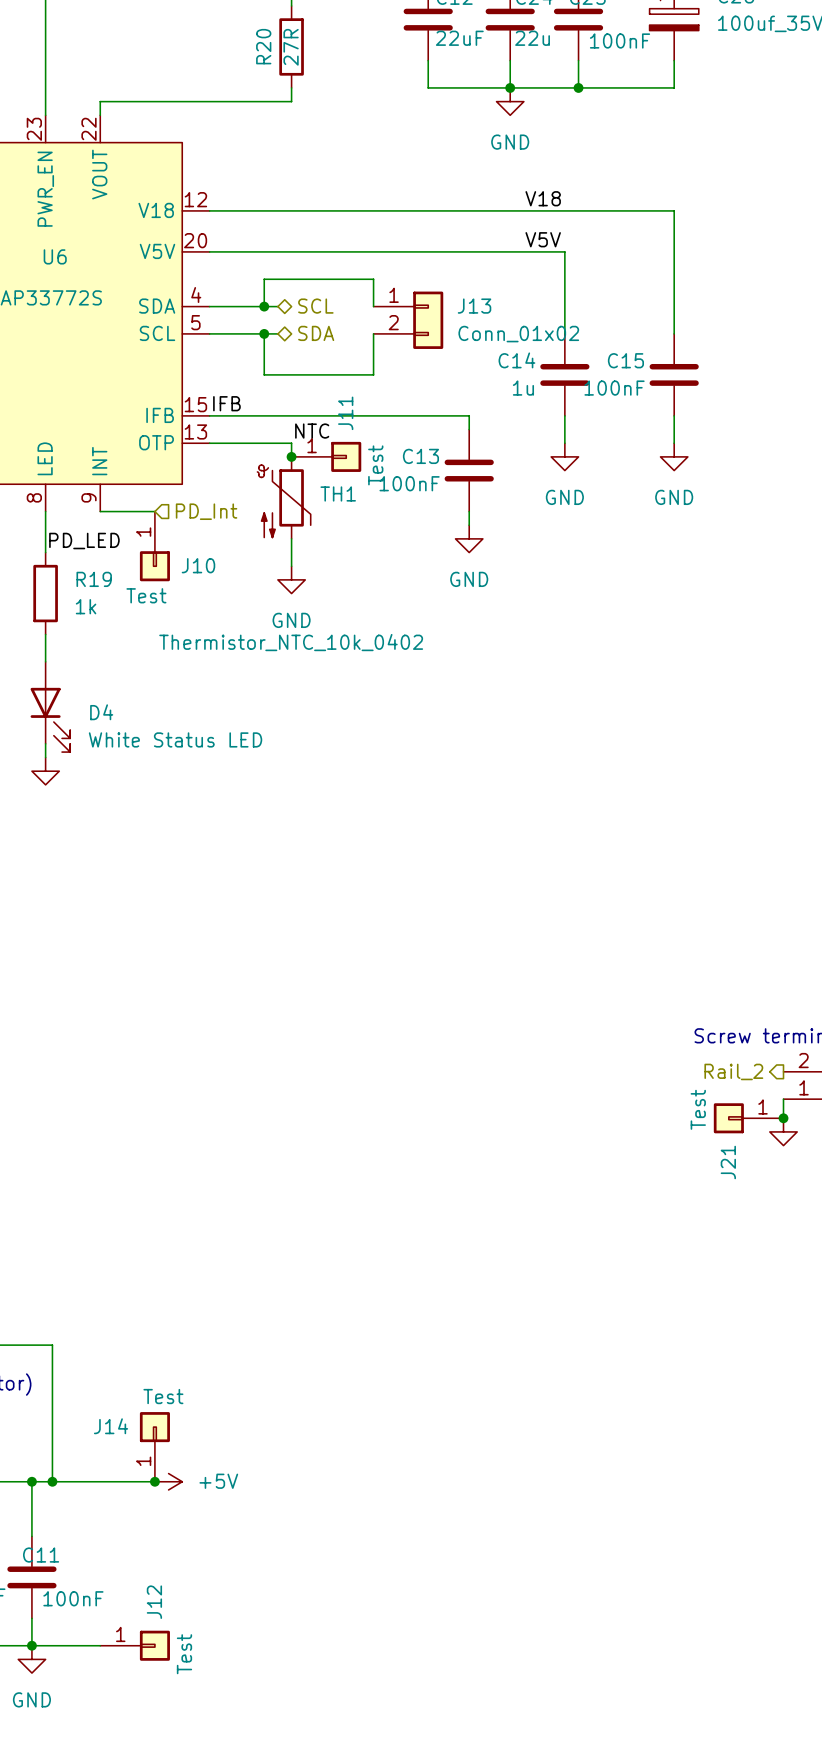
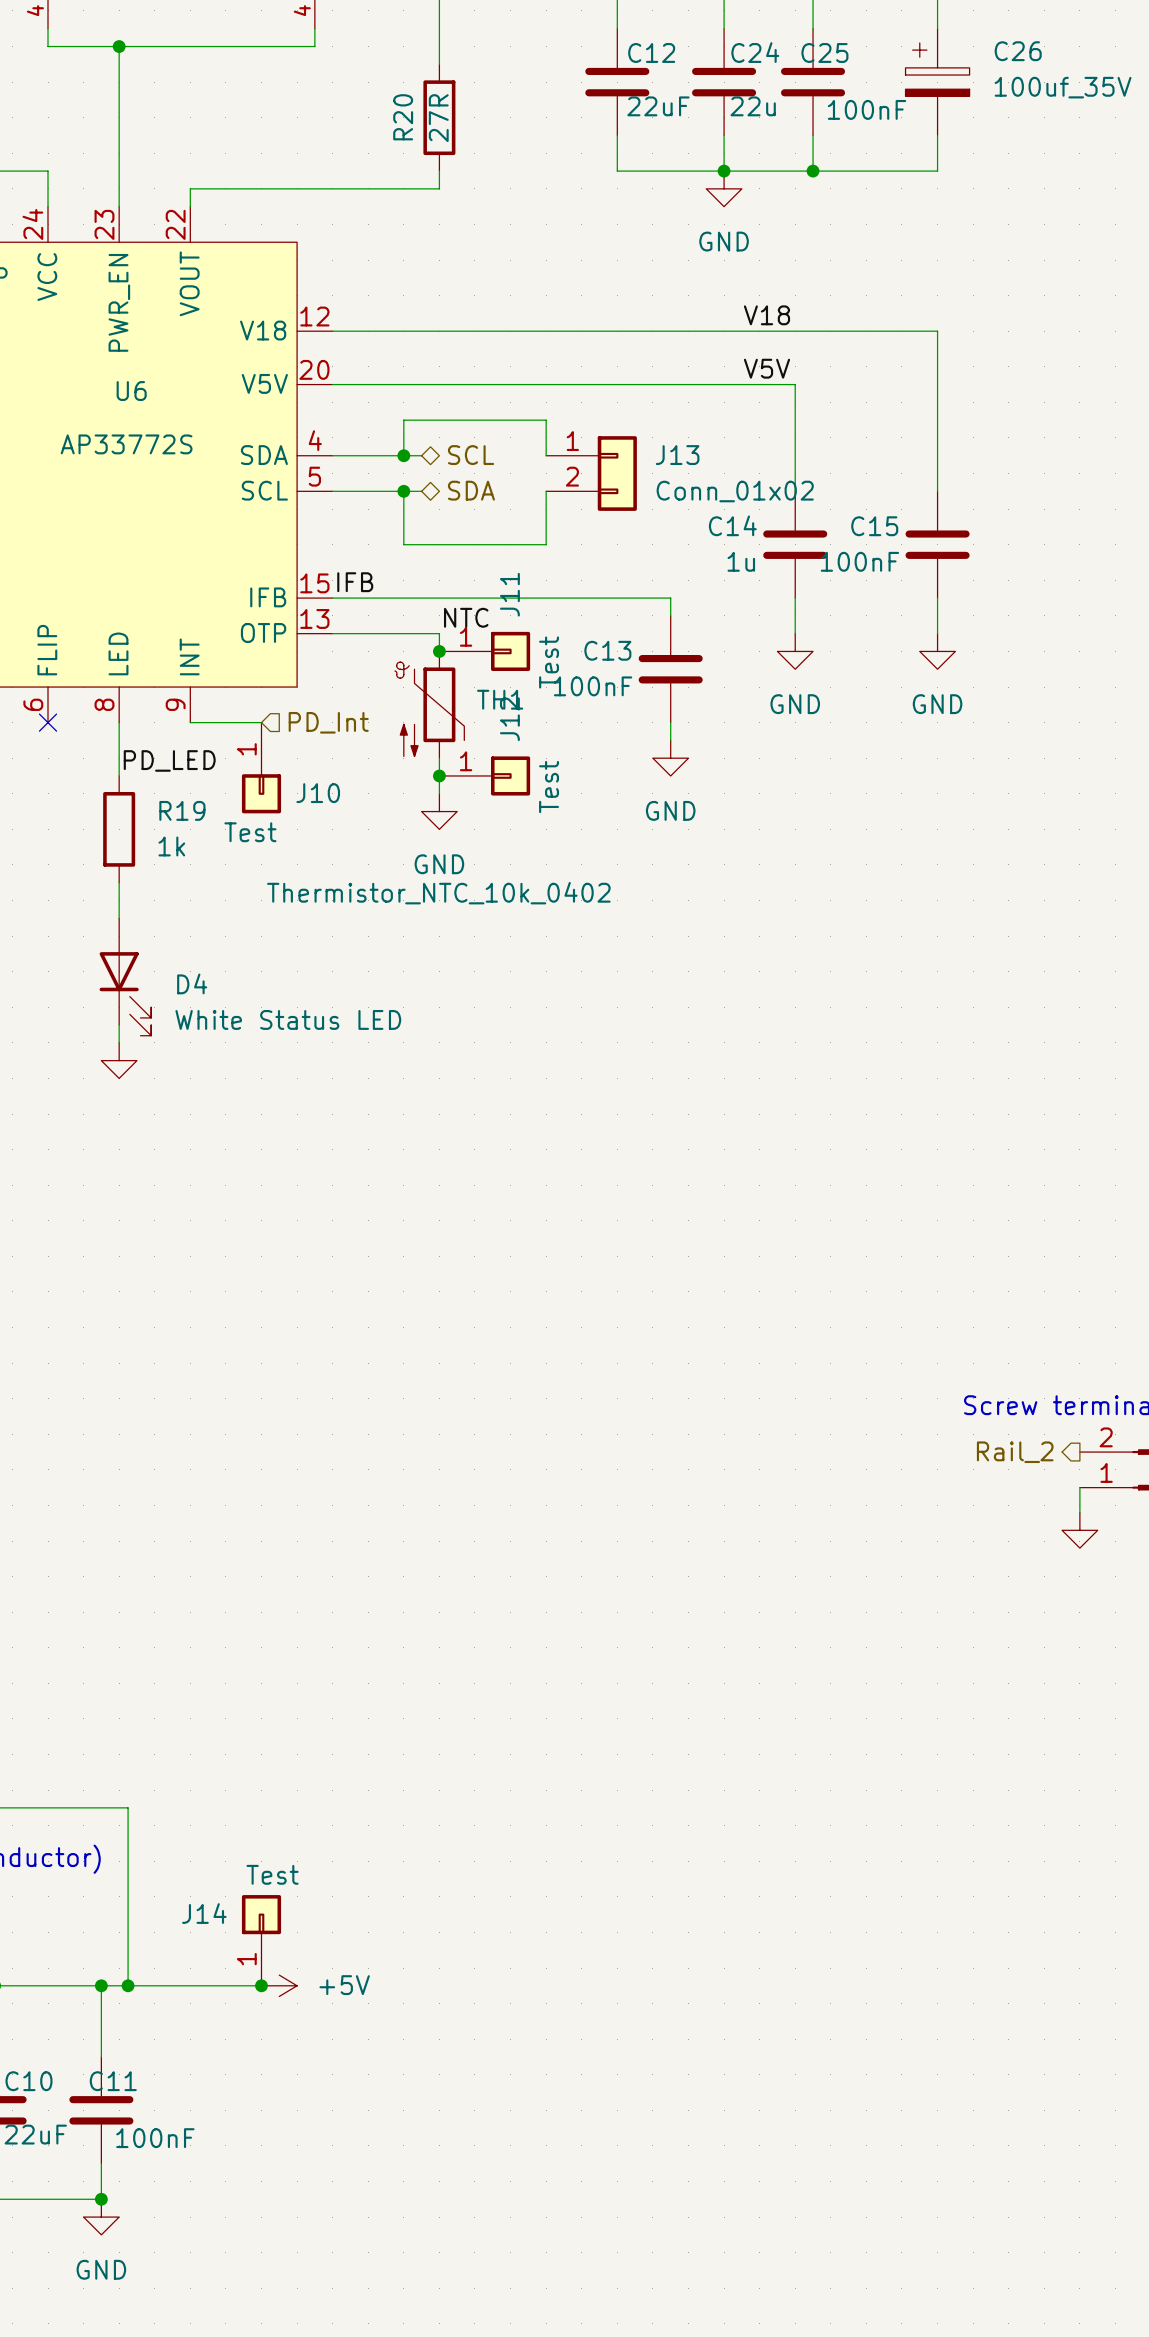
junction: none -> (439, 775)
J21: Test (748, 1118) -> none
junction: (783, 1118) -> none
wire: (31, 1645) (100, 1645) -> none
J12 position: (135, 1645) -> (484, 775)

